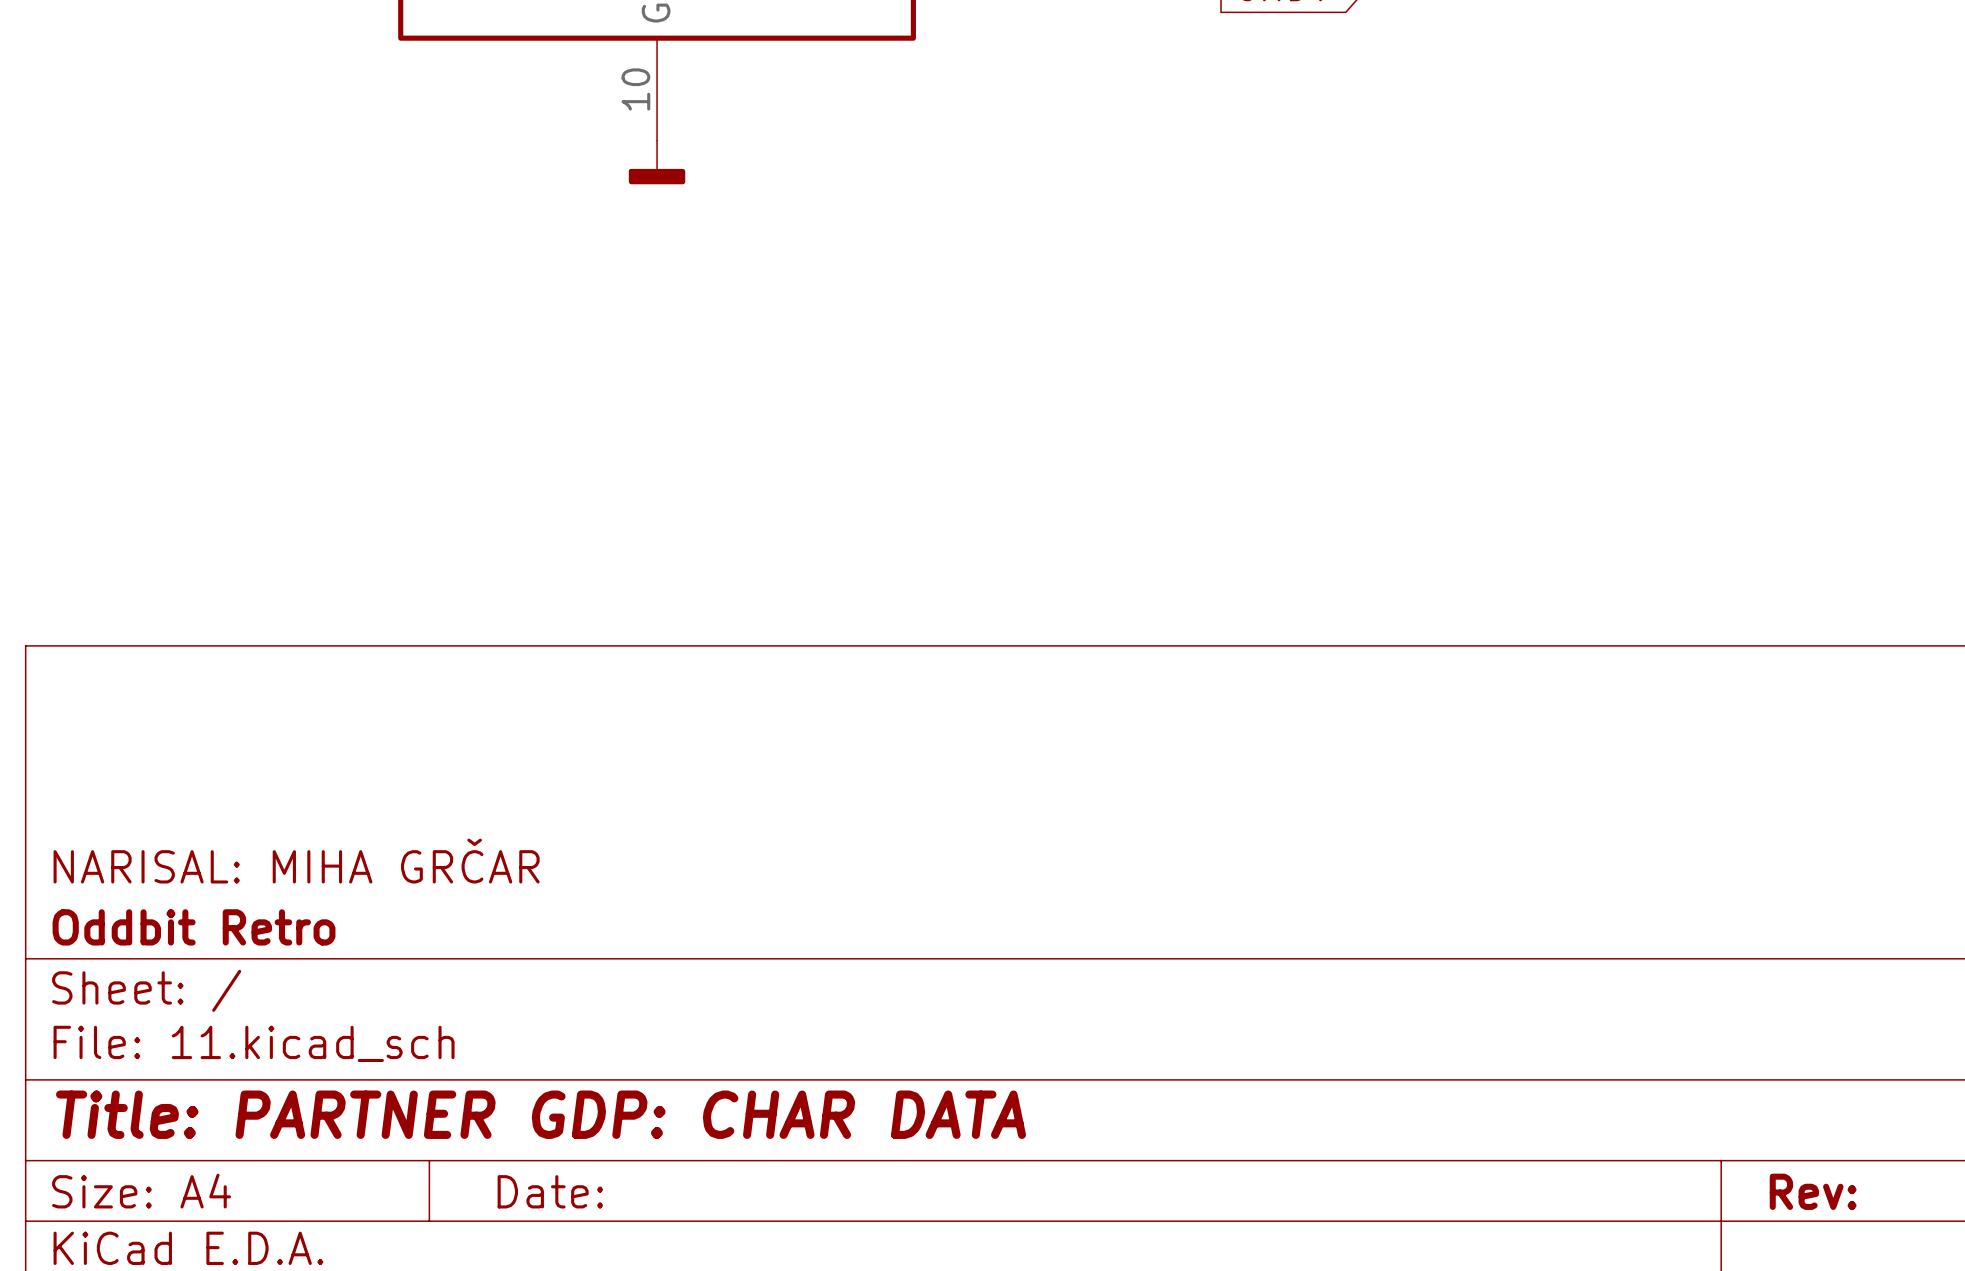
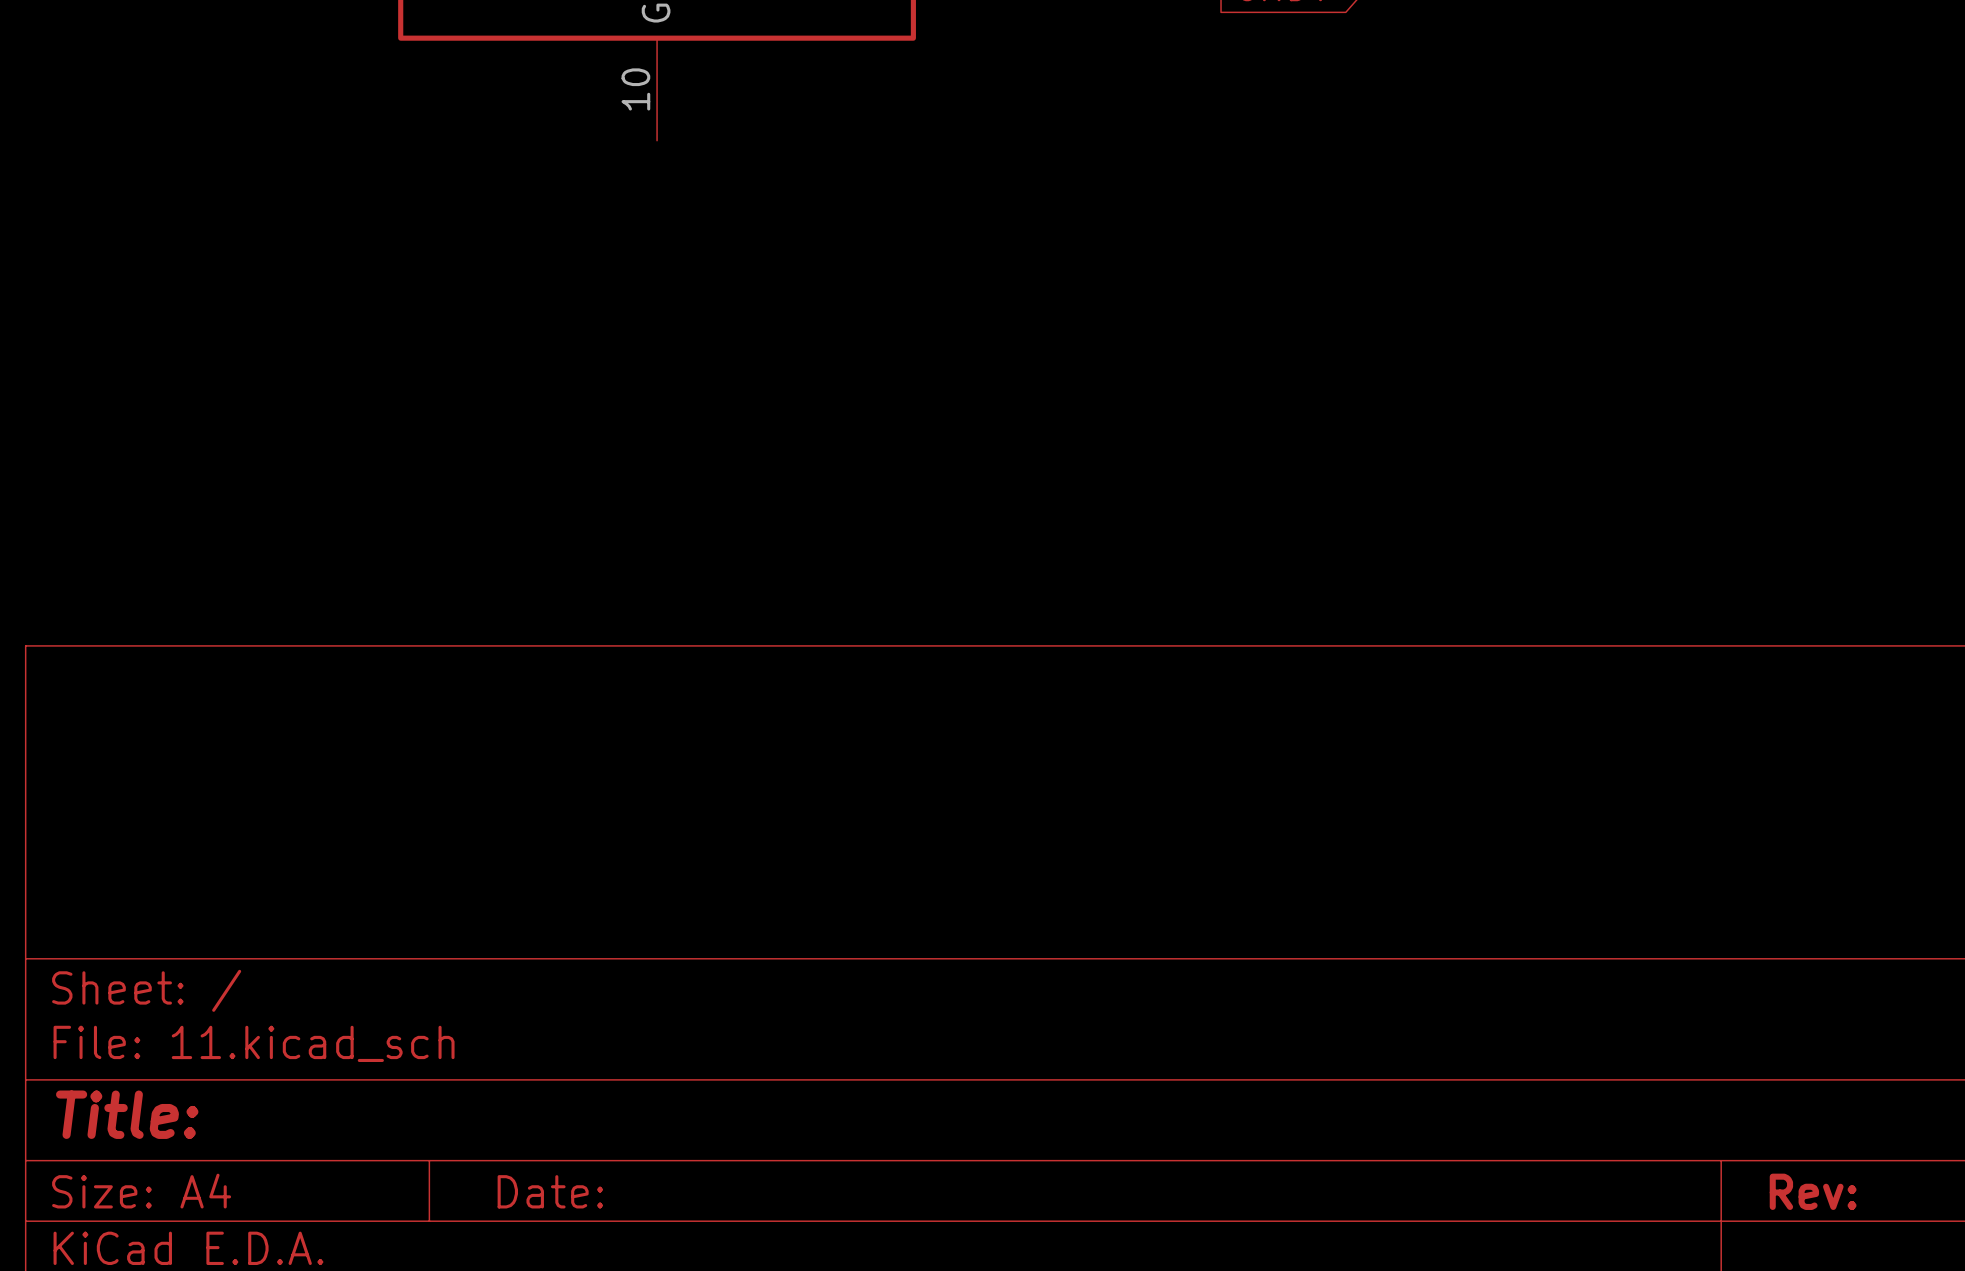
power symbol: (657, 162) -> none
title block: NARISAL: MIHA GRČAR (296, 861) -> none
title block: Oddbit Retro (194, 927) -> none
title block: Title: PARTNER GDP: CHAR DATA (541, 1114) -> Title: (127, 1114)

